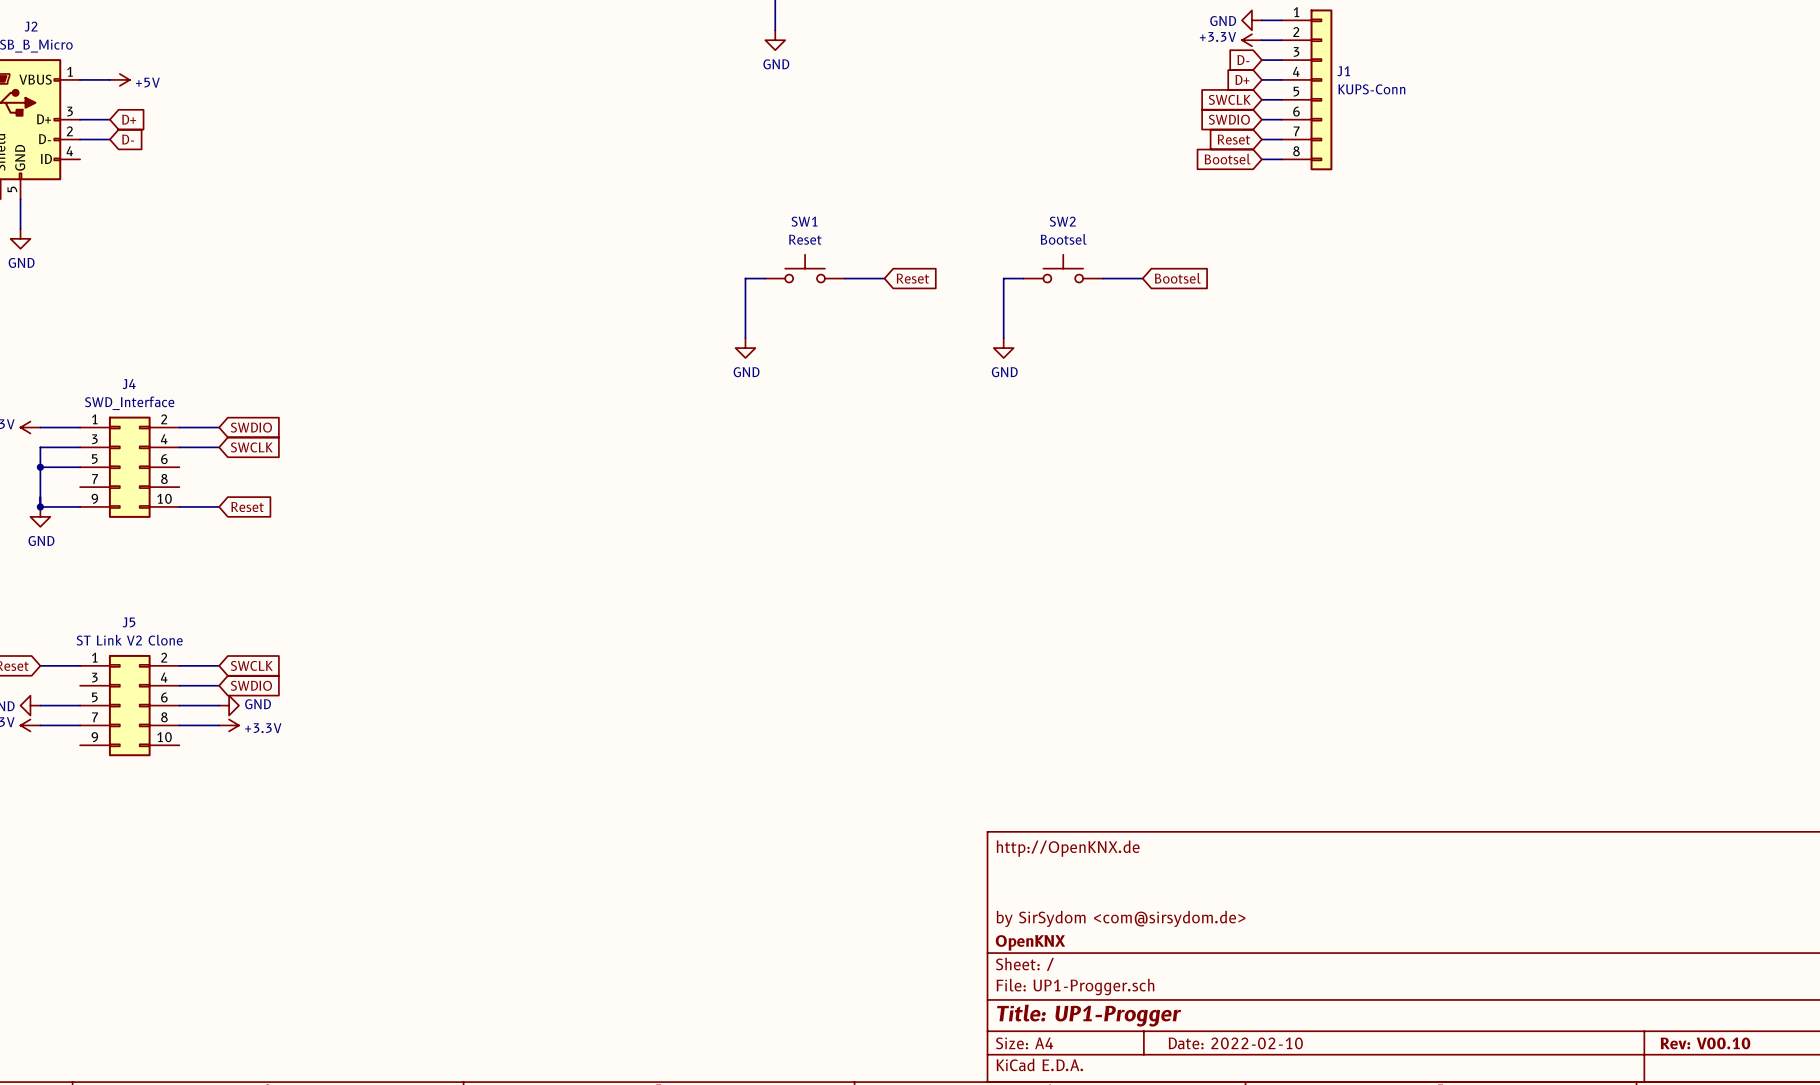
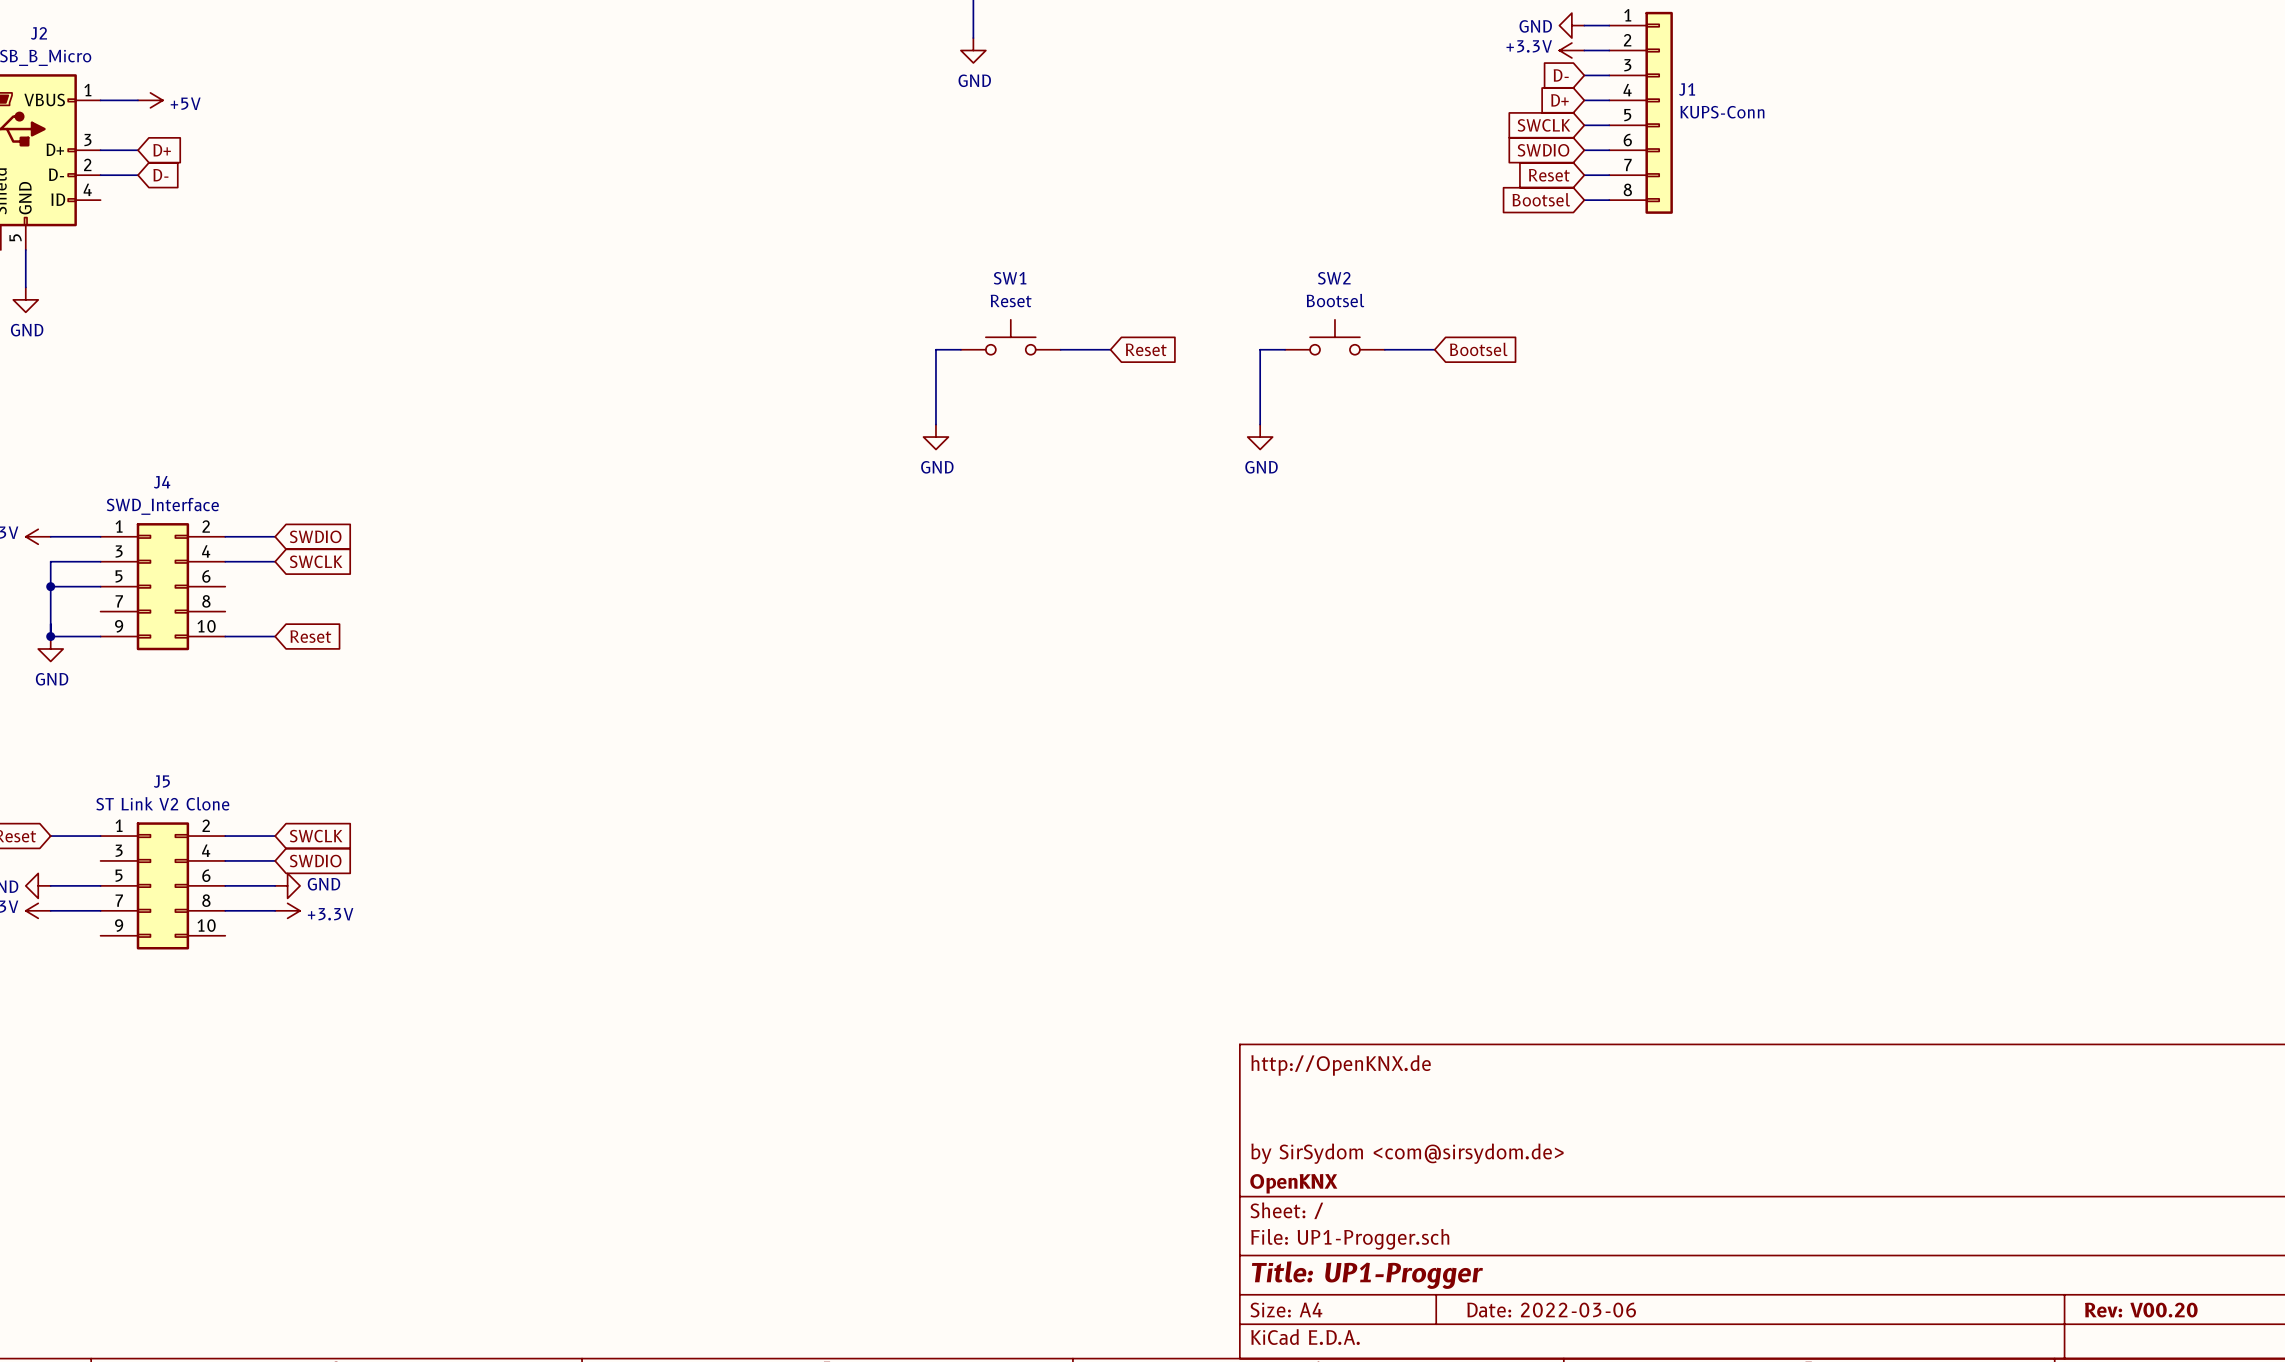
title block: Date: 2022-02-10 (1235, 1043) -> Date: 2022-03-06 (1551, 1310)
title block: Rev: V00.10 (1705, 1043) -> Rev: V00.20 (2141, 1310)

